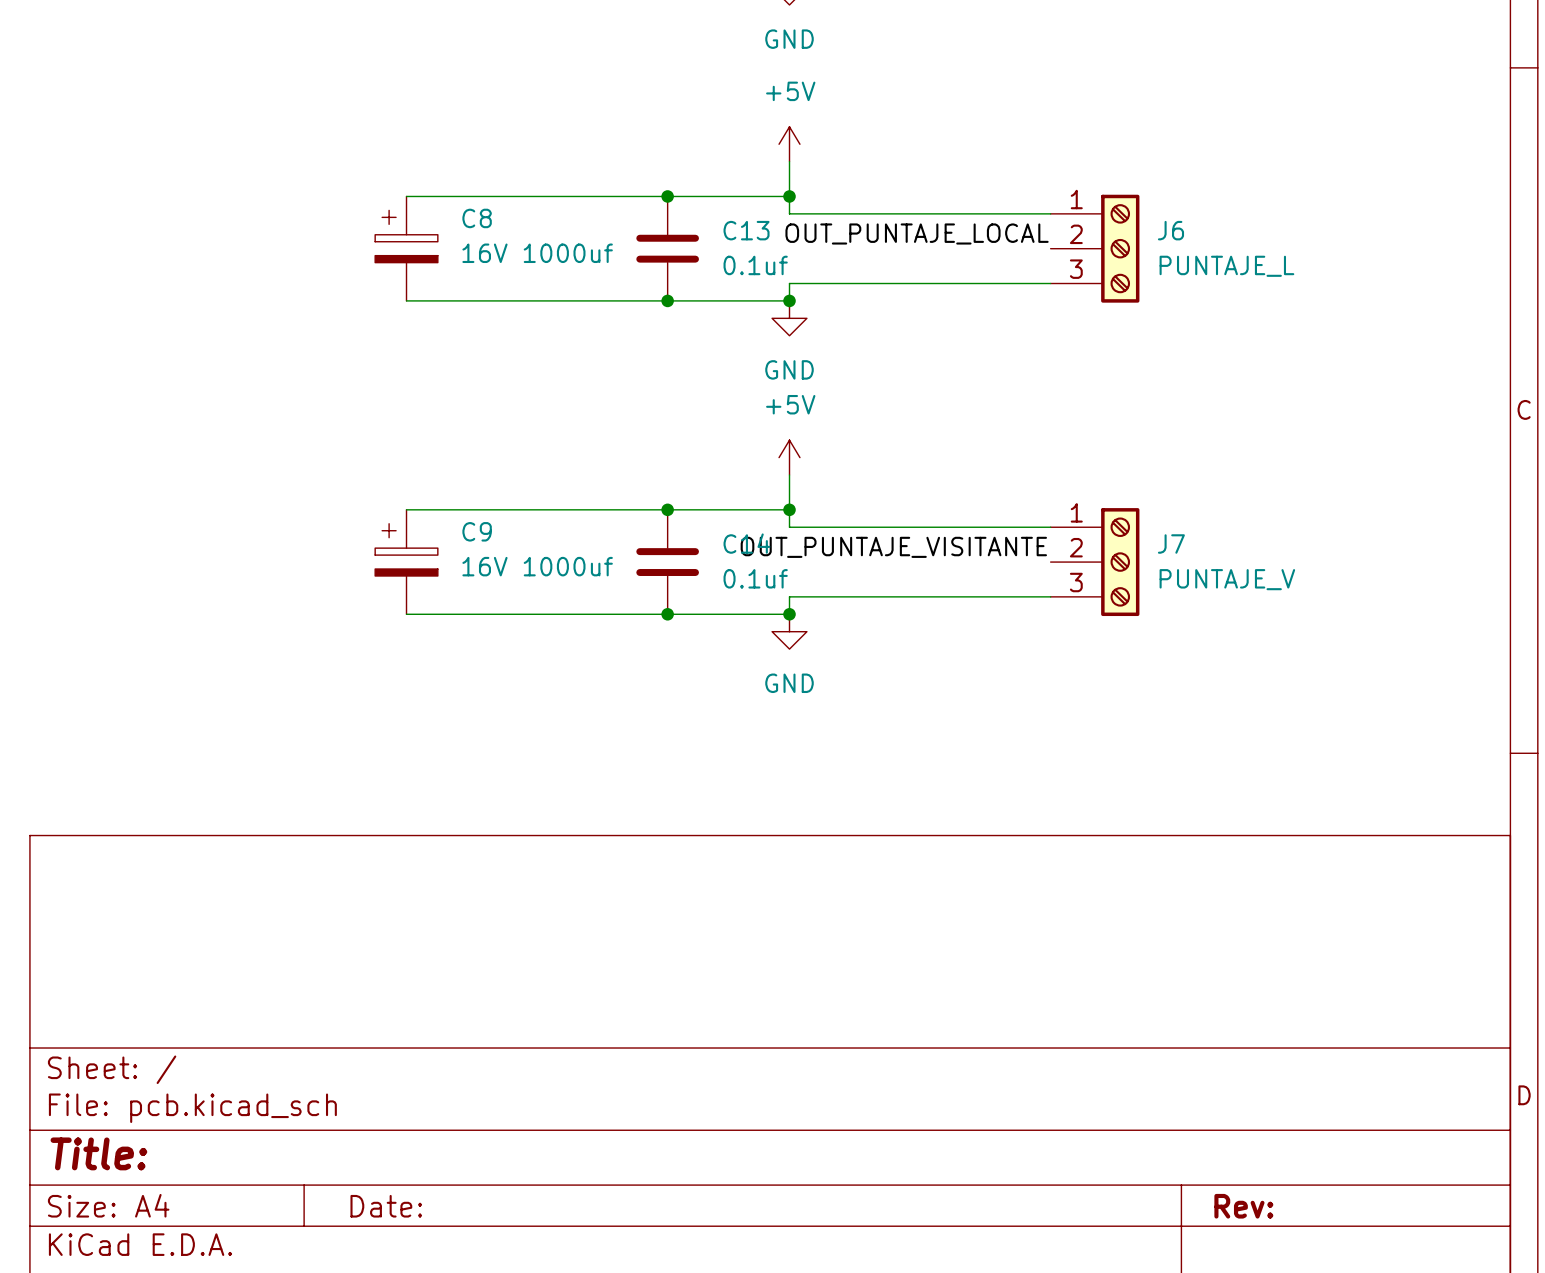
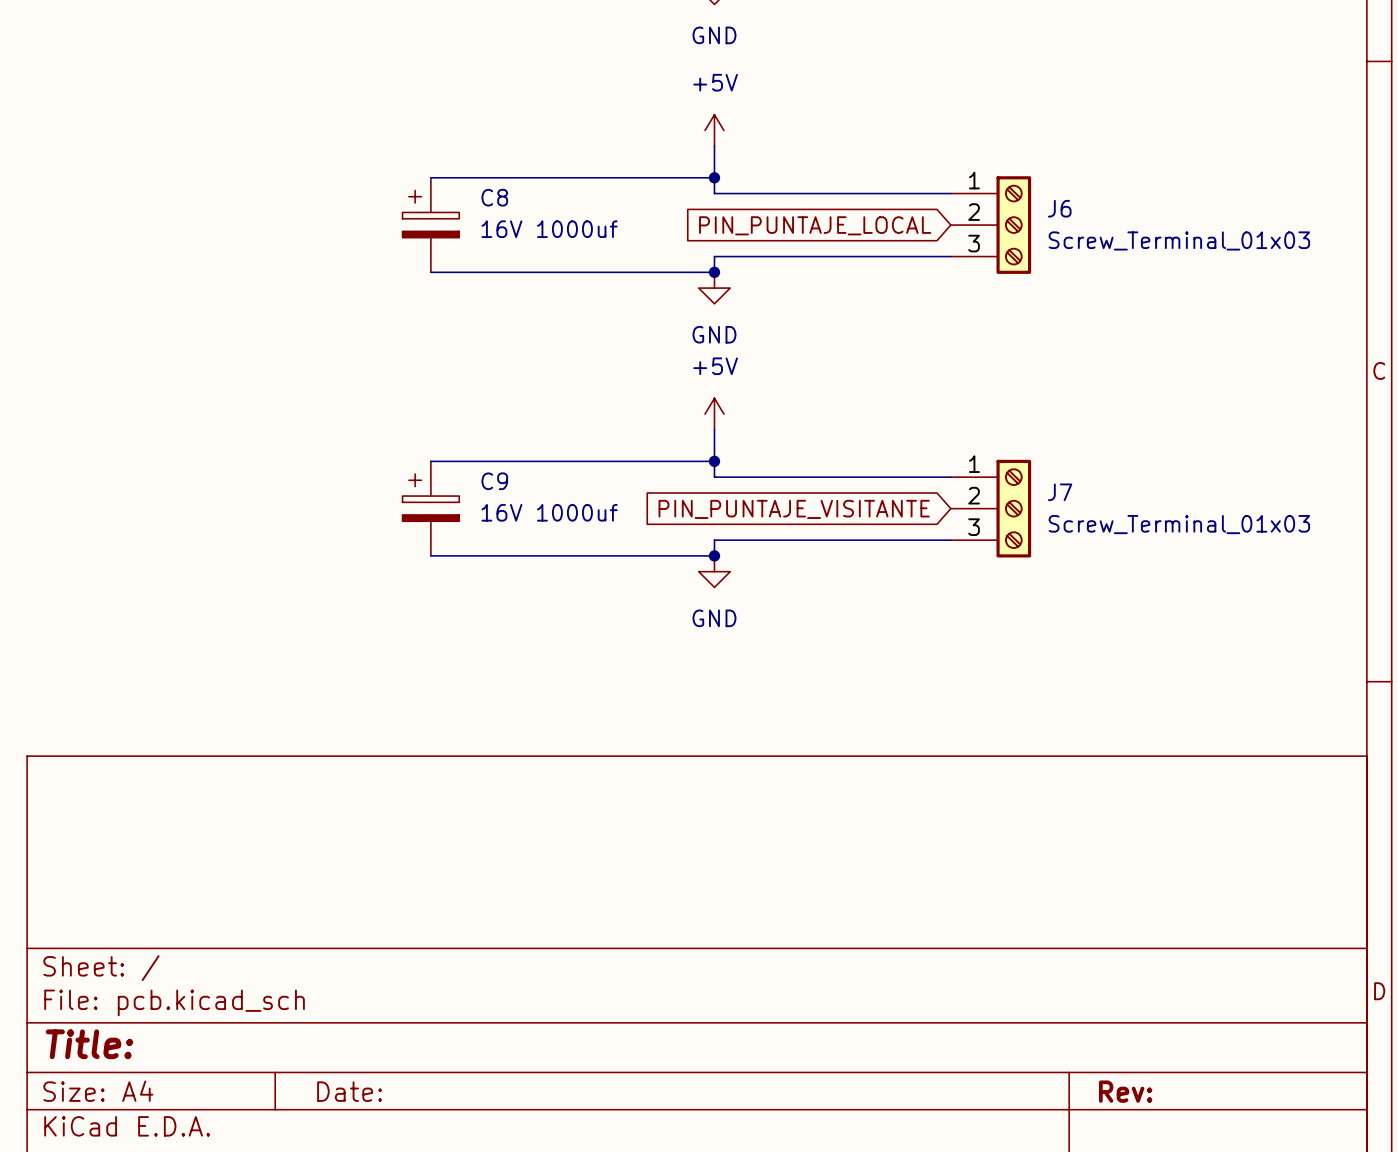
wire: (406, 196) (476, 196) -> none
junction: (667, 196) -> none
label: OUT_PUNTAJE_LOCAL (917, 233) -> none
C8 position: (406, 248) -> (430, 225)
C13: 0.1uf (667, 248) -> none
global label: none -> PIN_PUNTAJE_LOCAL (815, 225)
J6 value: PUNTAJE_L (1226, 266) -> Screw_Terminal_01x03 (1179, 240)
wire: (406, 300) (476, 300) -> none
junction: (667, 300) -> none
wire: (406, 509) (476, 509) -> none
junction: (667, 509) -> none
label: OUT_PUNTAJE_VISITANTE (893, 547) -> none
C9 position: (406, 562) -> (430, 508)
C14: 0.1uf (667, 562) -> none
global label: none -> PIN_PUNTAJE_VISITANTE (794, 509)
J7 value: PUNTAJE_V (1227, 579) -> Screw_Terminal_01x03 (1179, 524)
wire: (406, 614) (476, 614) -> none
junction: (667, 614) -> none

